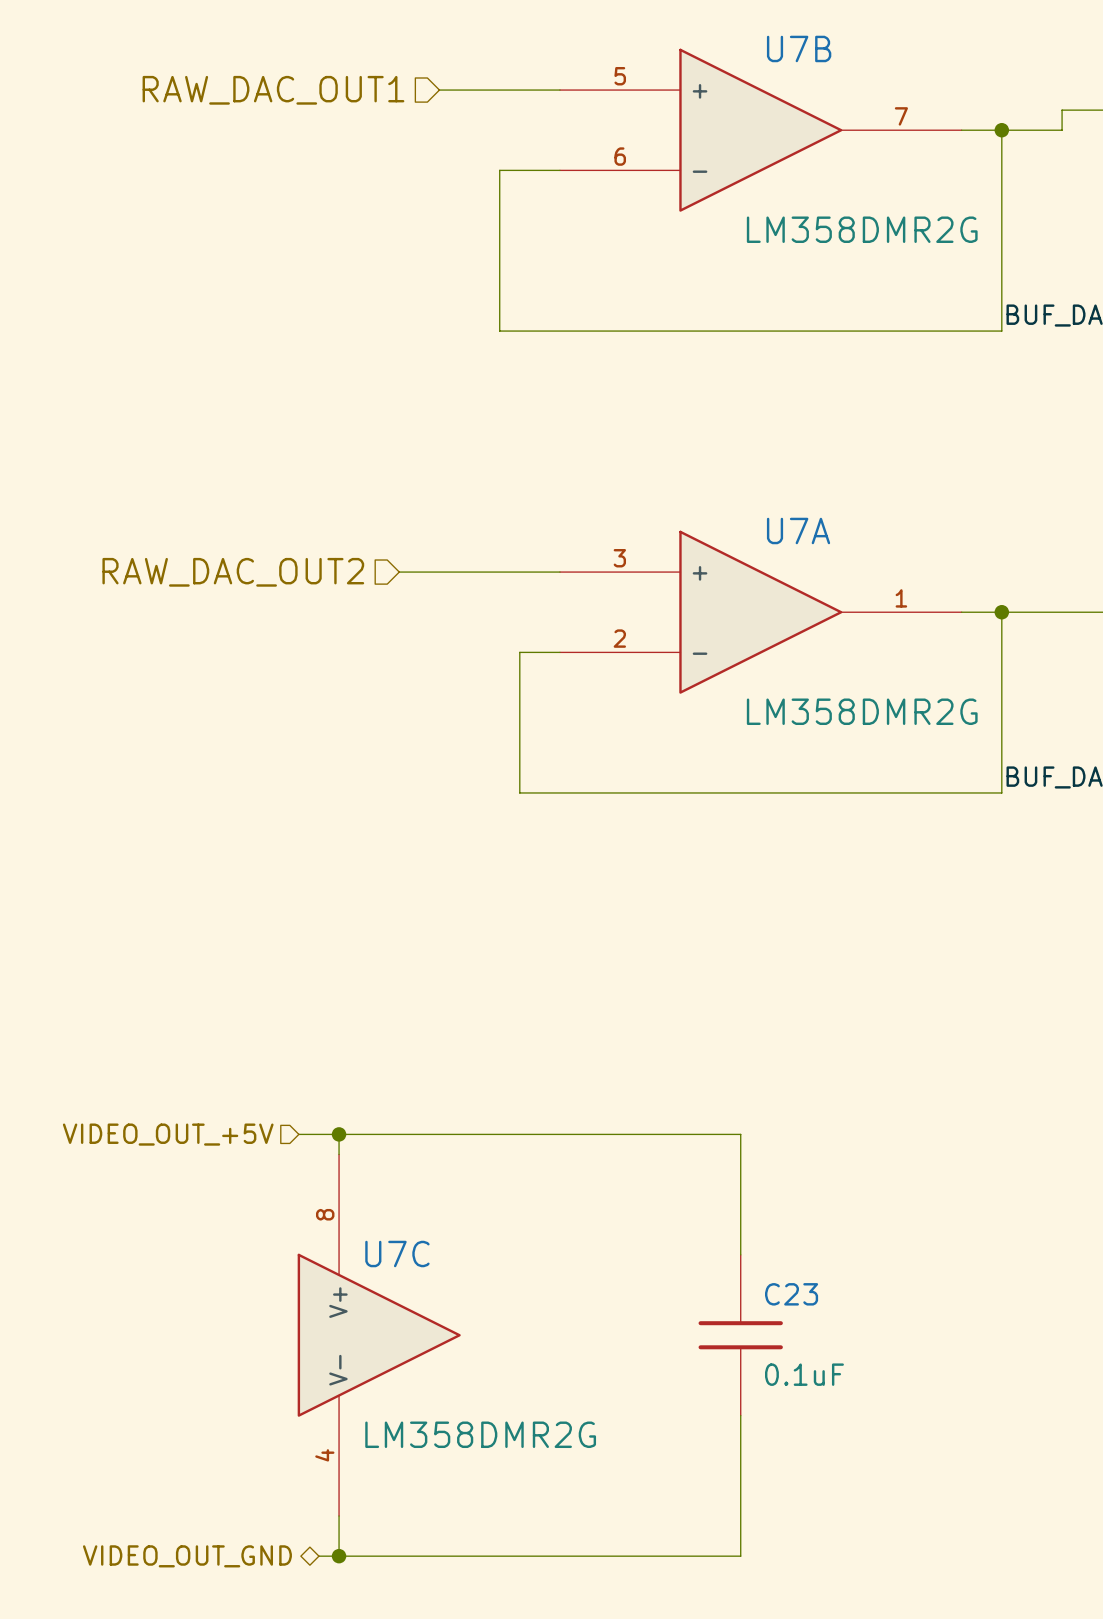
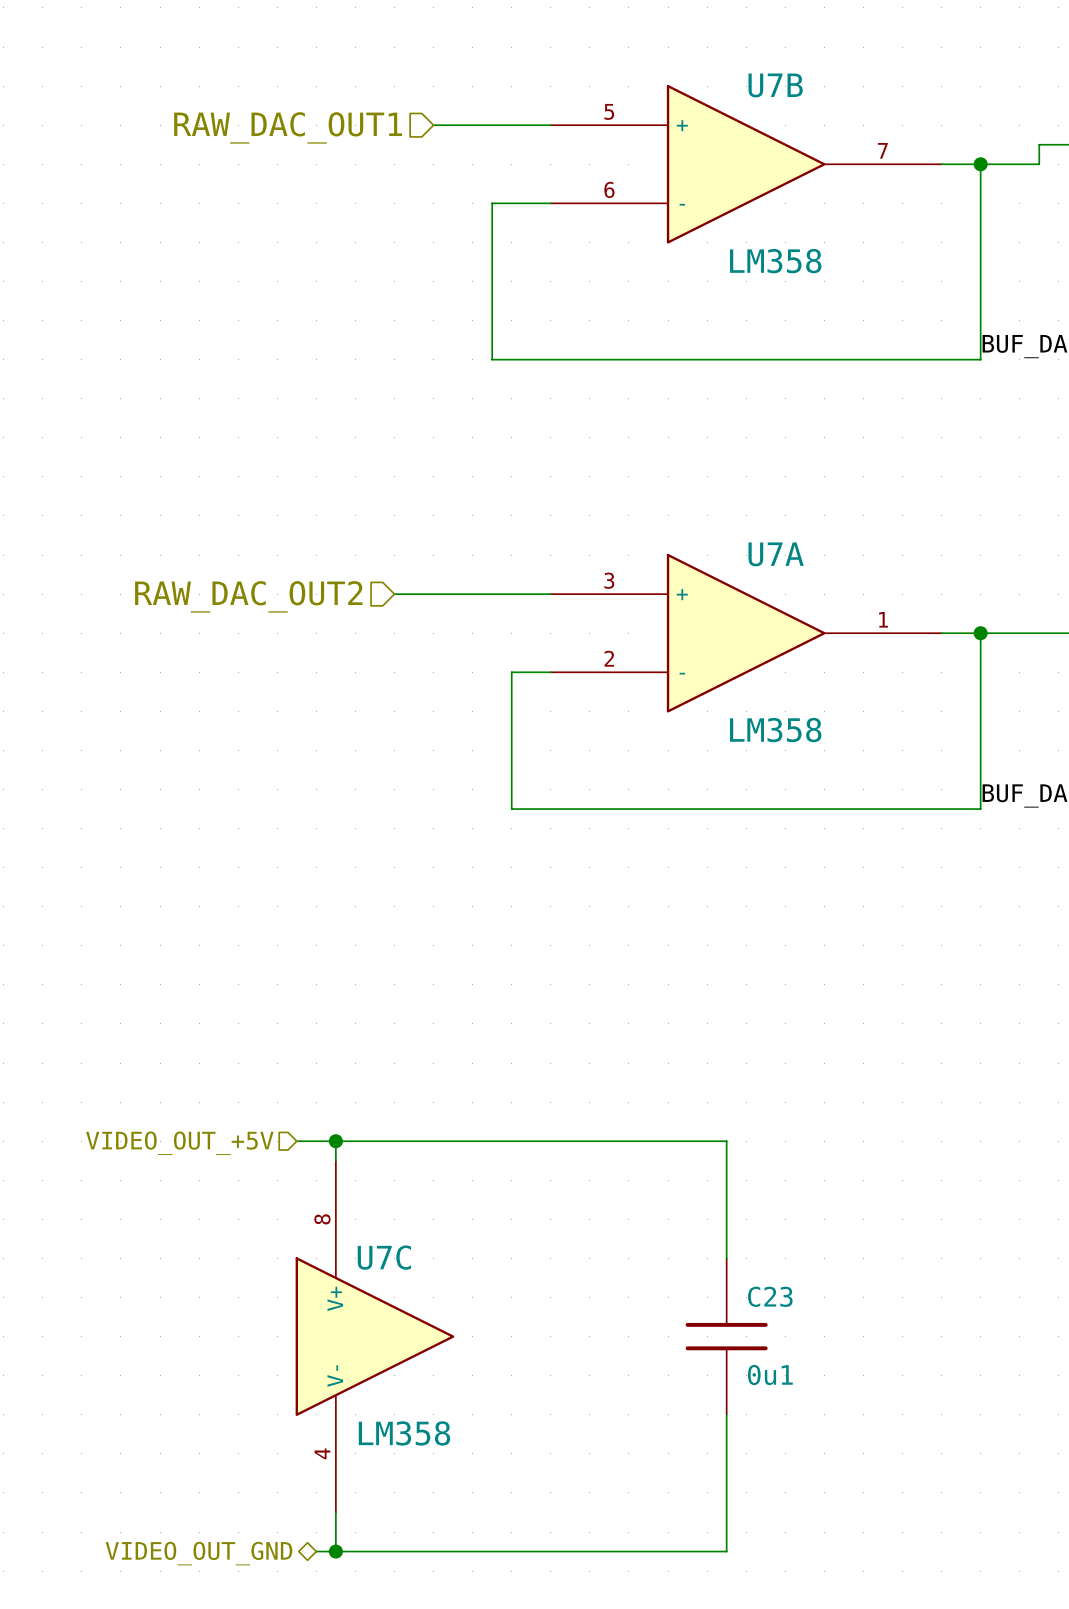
U7B value: LM358DMR2G (862, 229) -> LM358 (775, 261)
U7A value: LM358DMR2G (862, 711) -> LM358 (775, 730)
C23 value: 0.1uF (804, 1374) -> 0u1 (770, 1374)
U7C value: LM358DMR2G (480, 1434) -> LM358 (404, 1433)

